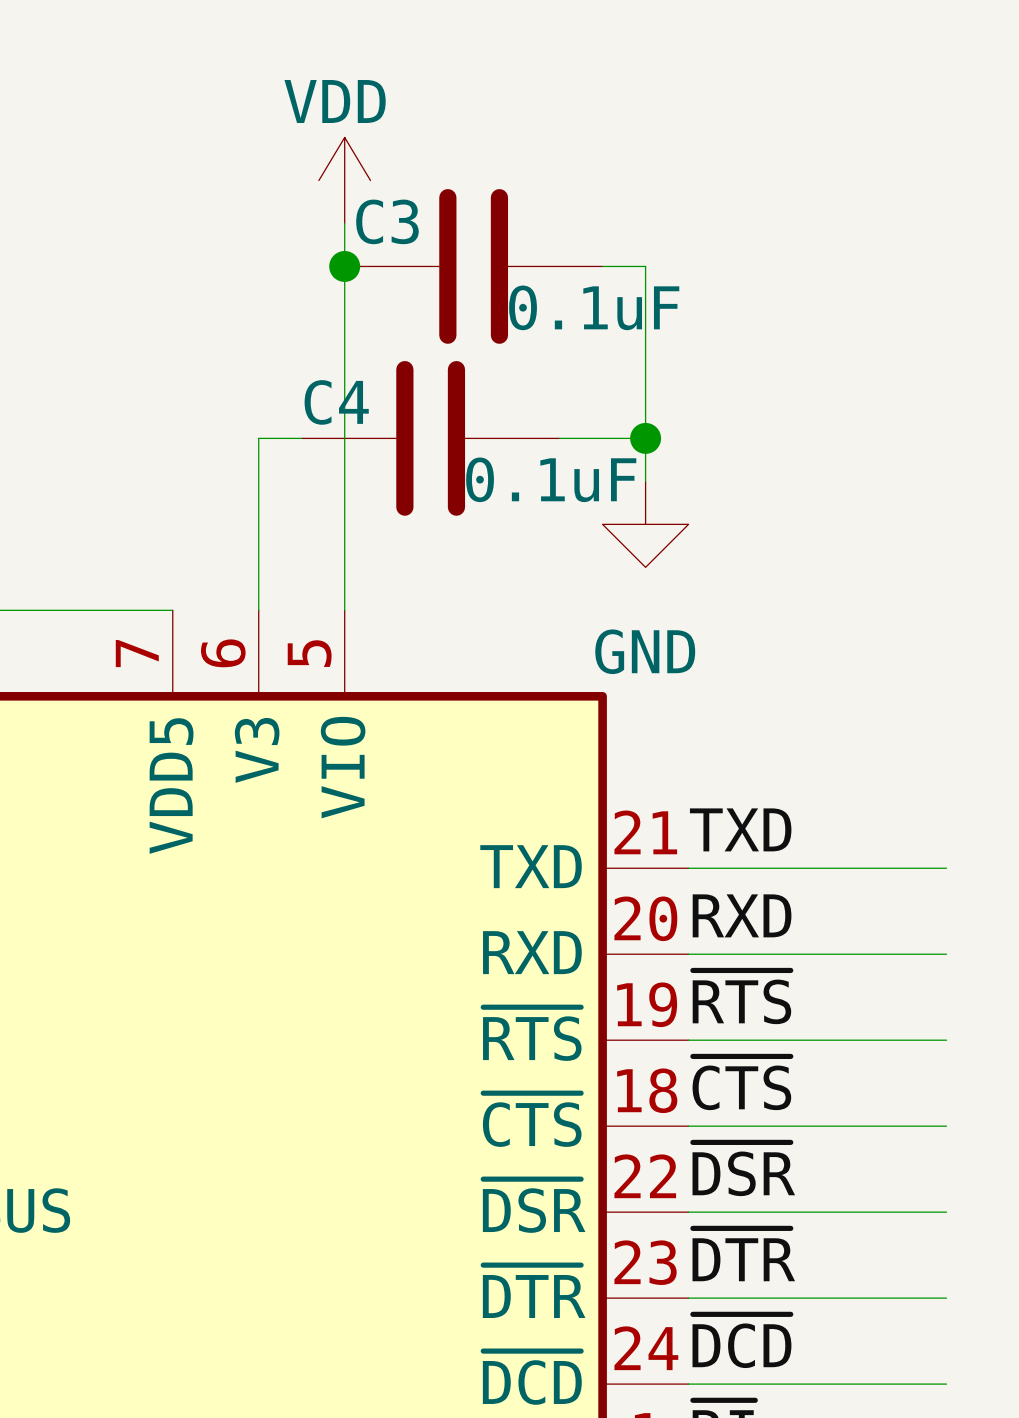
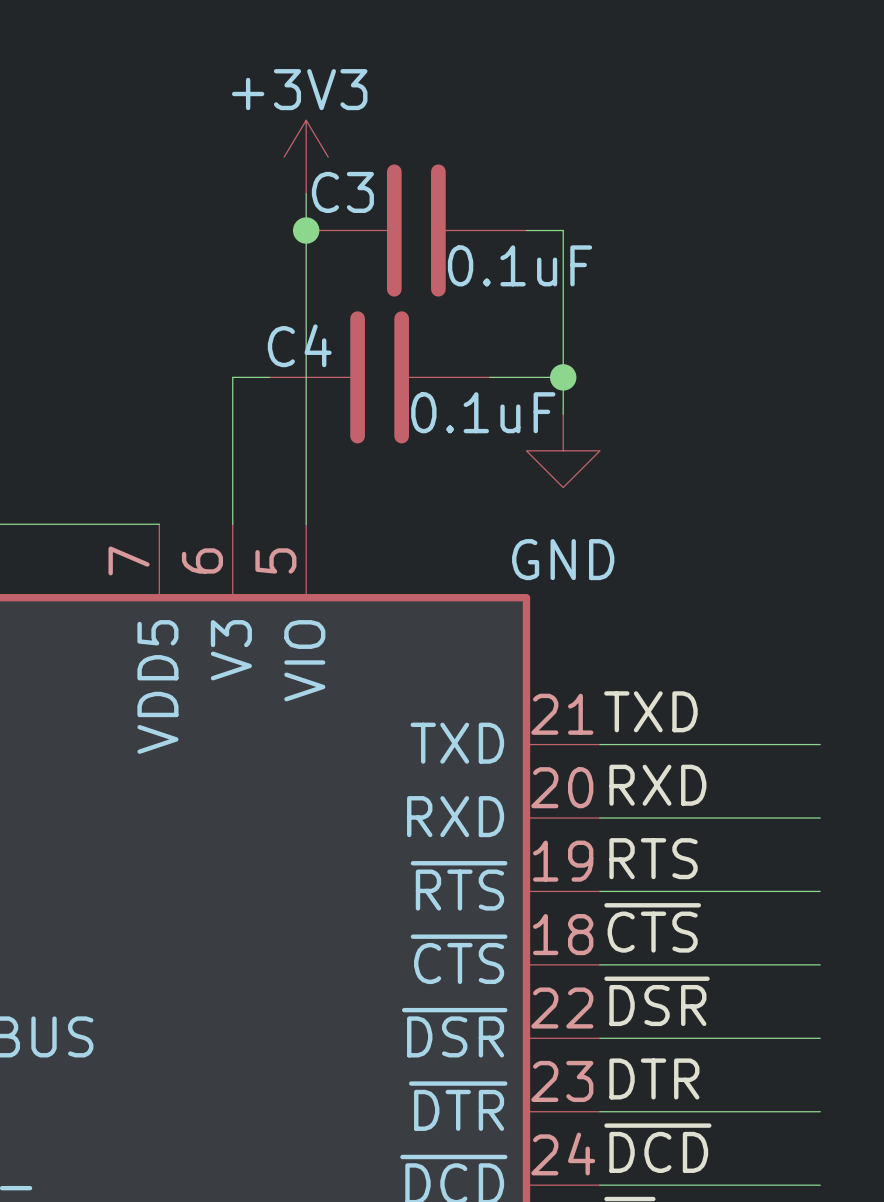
power symbol: VDD (344, 180) -> +3V3 (306, 157)
label: ~{RTS} (741, 997) -> RTS (653, 858)
label: ~{DTR} (743, 1254) -> DTR (654, 1078)

